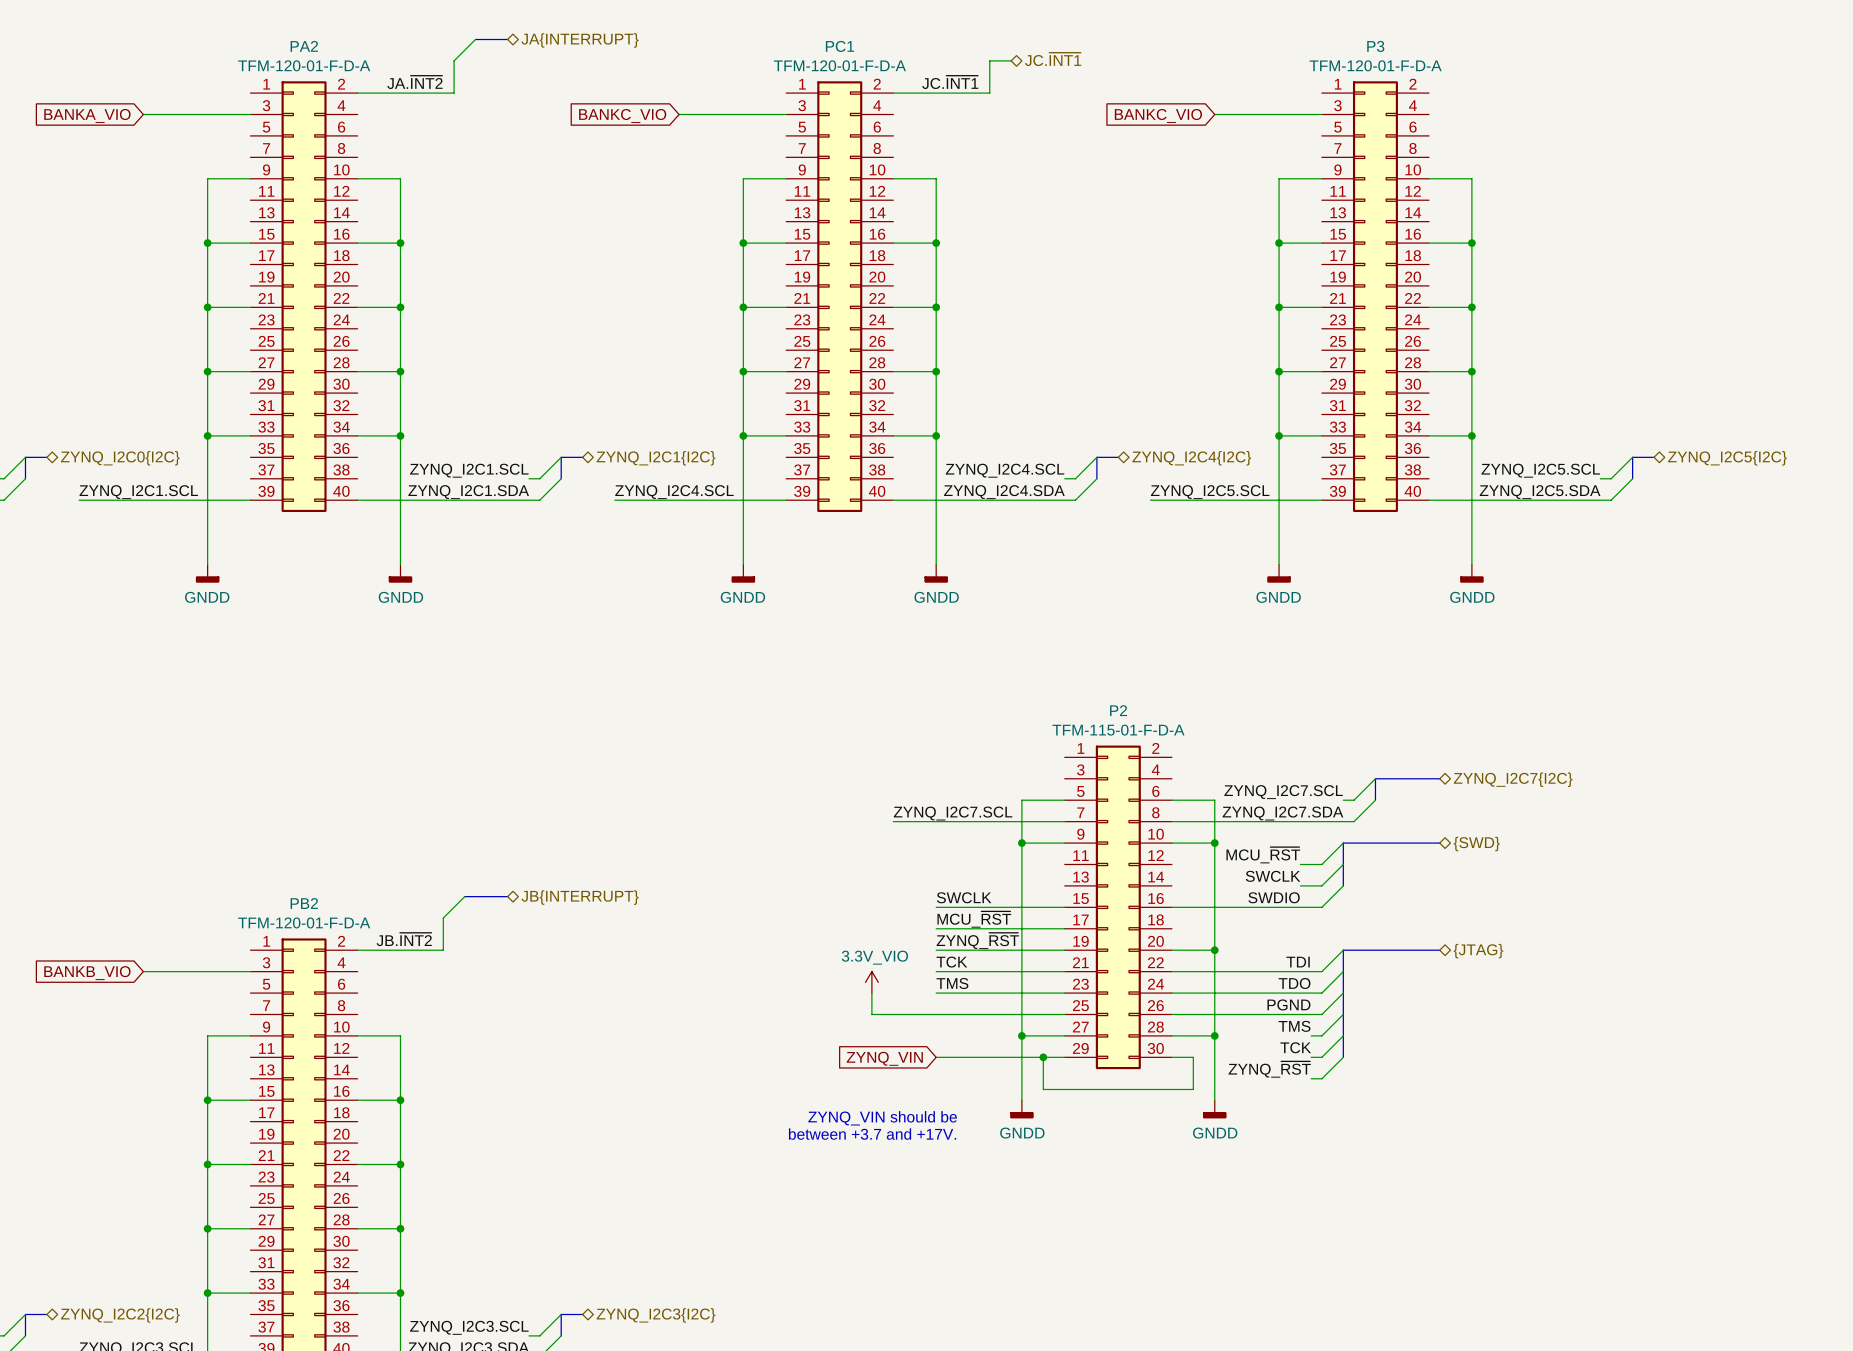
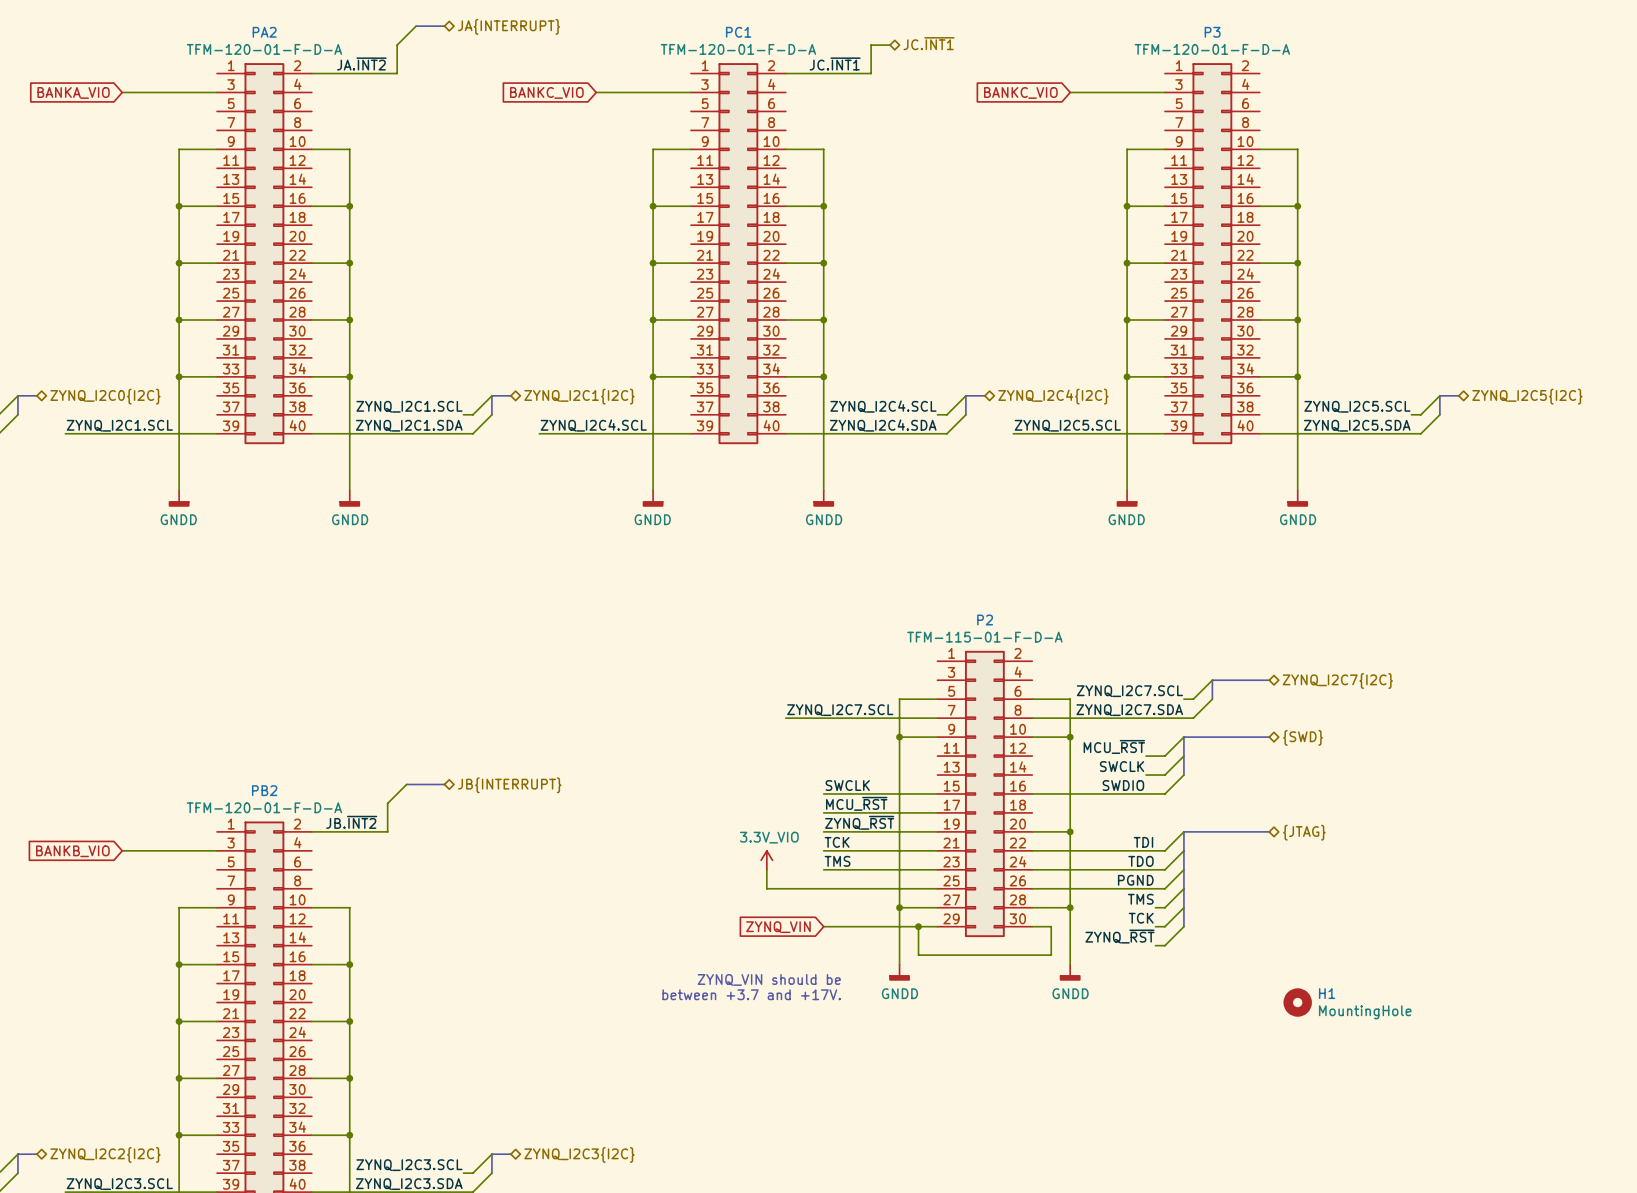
H1: none -> MountingHole (1297, 1002)

